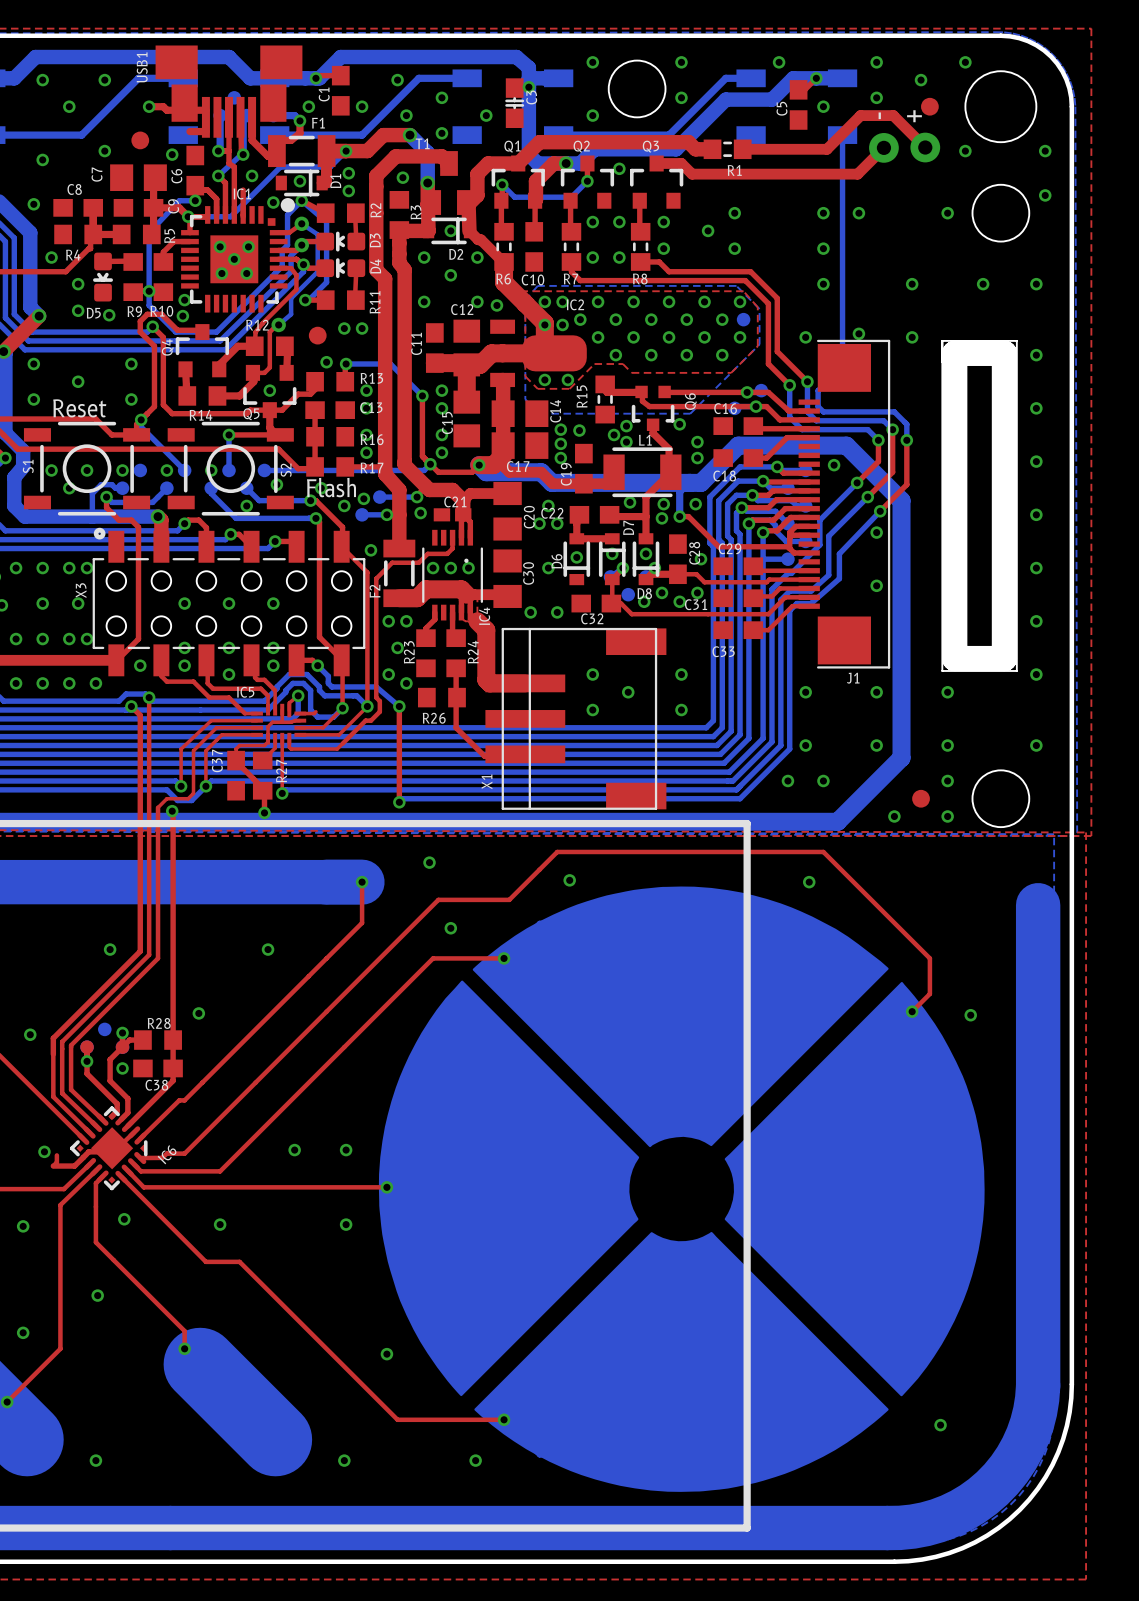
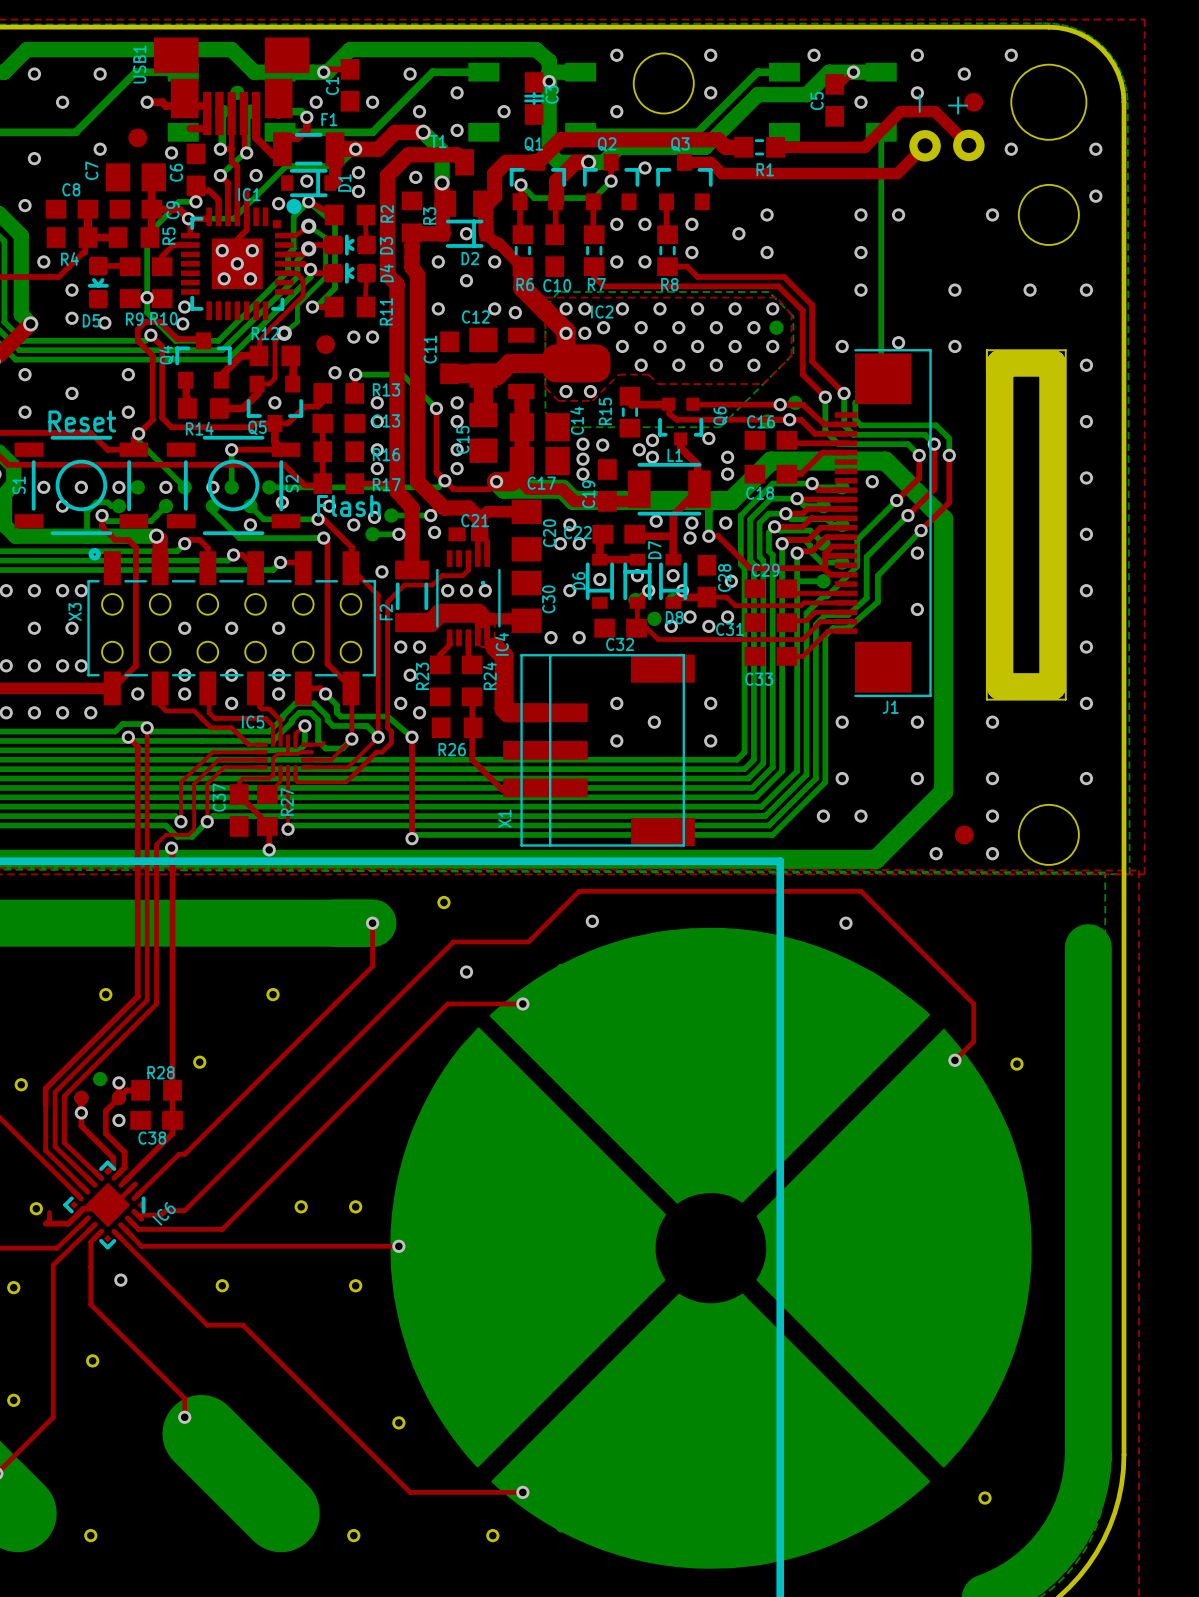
top track: none -> (246, 220) (246, 229) (237, 239)

